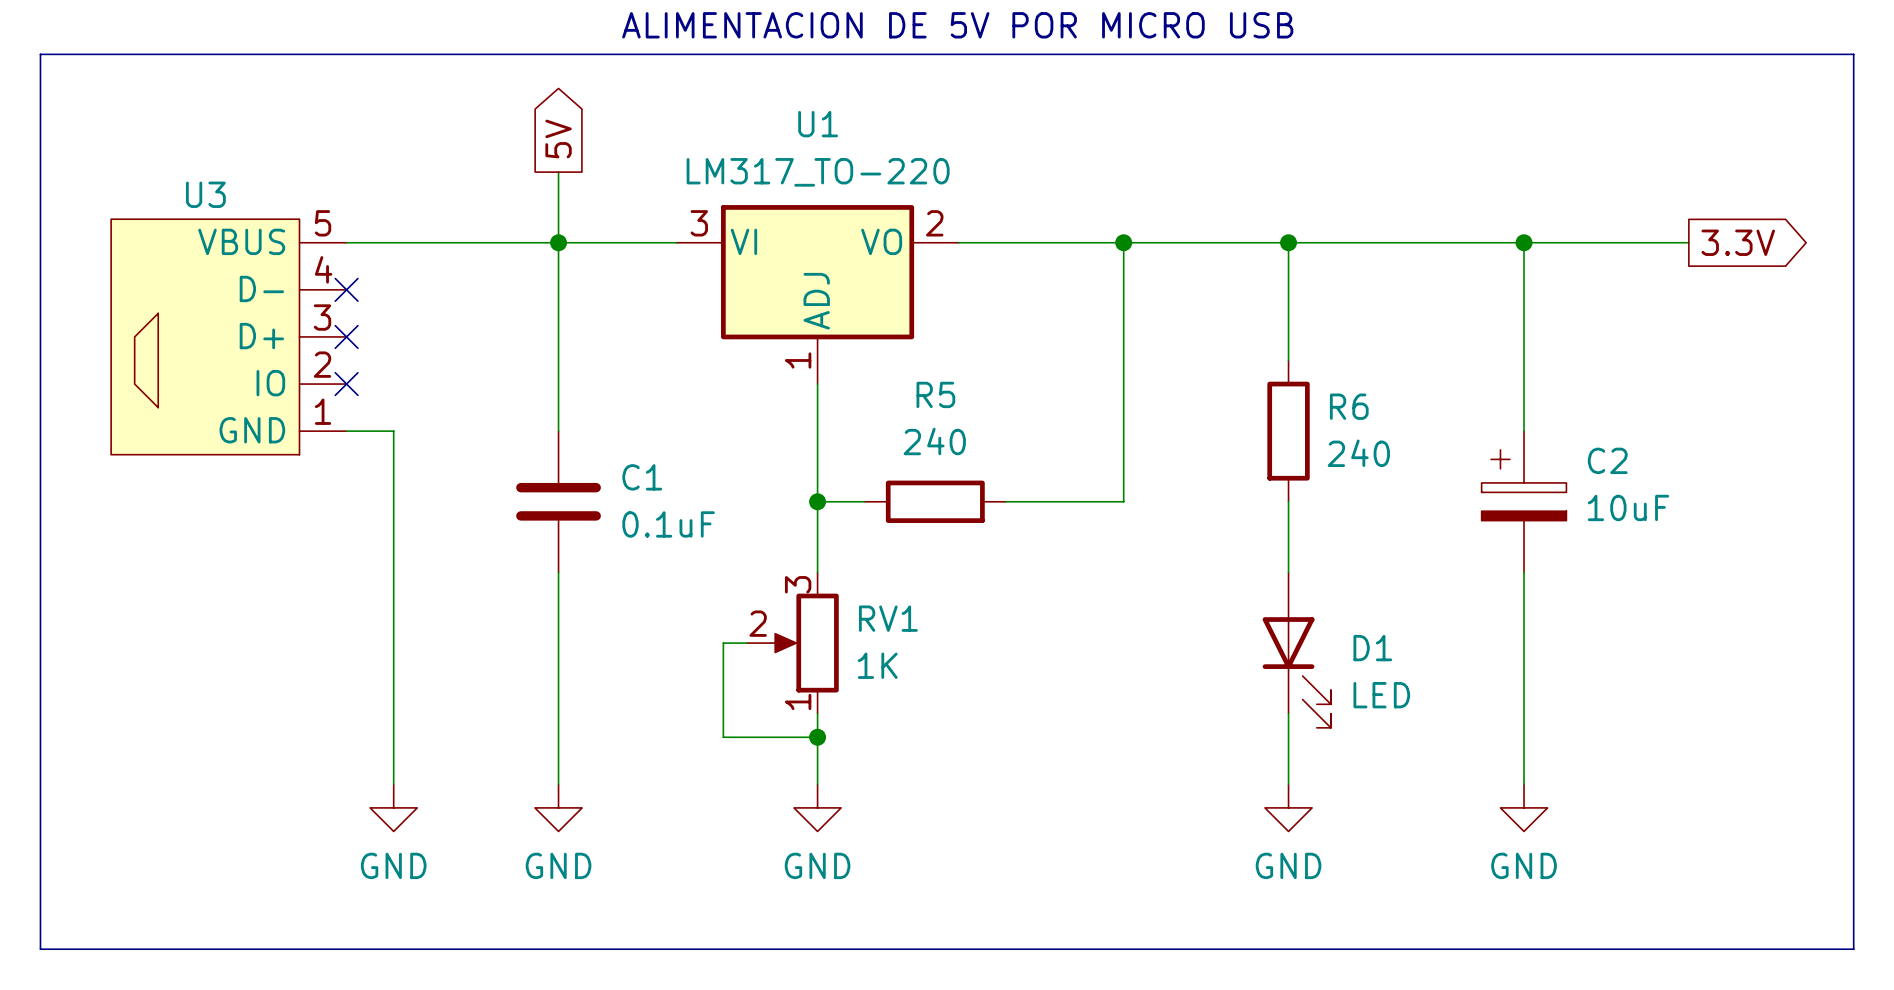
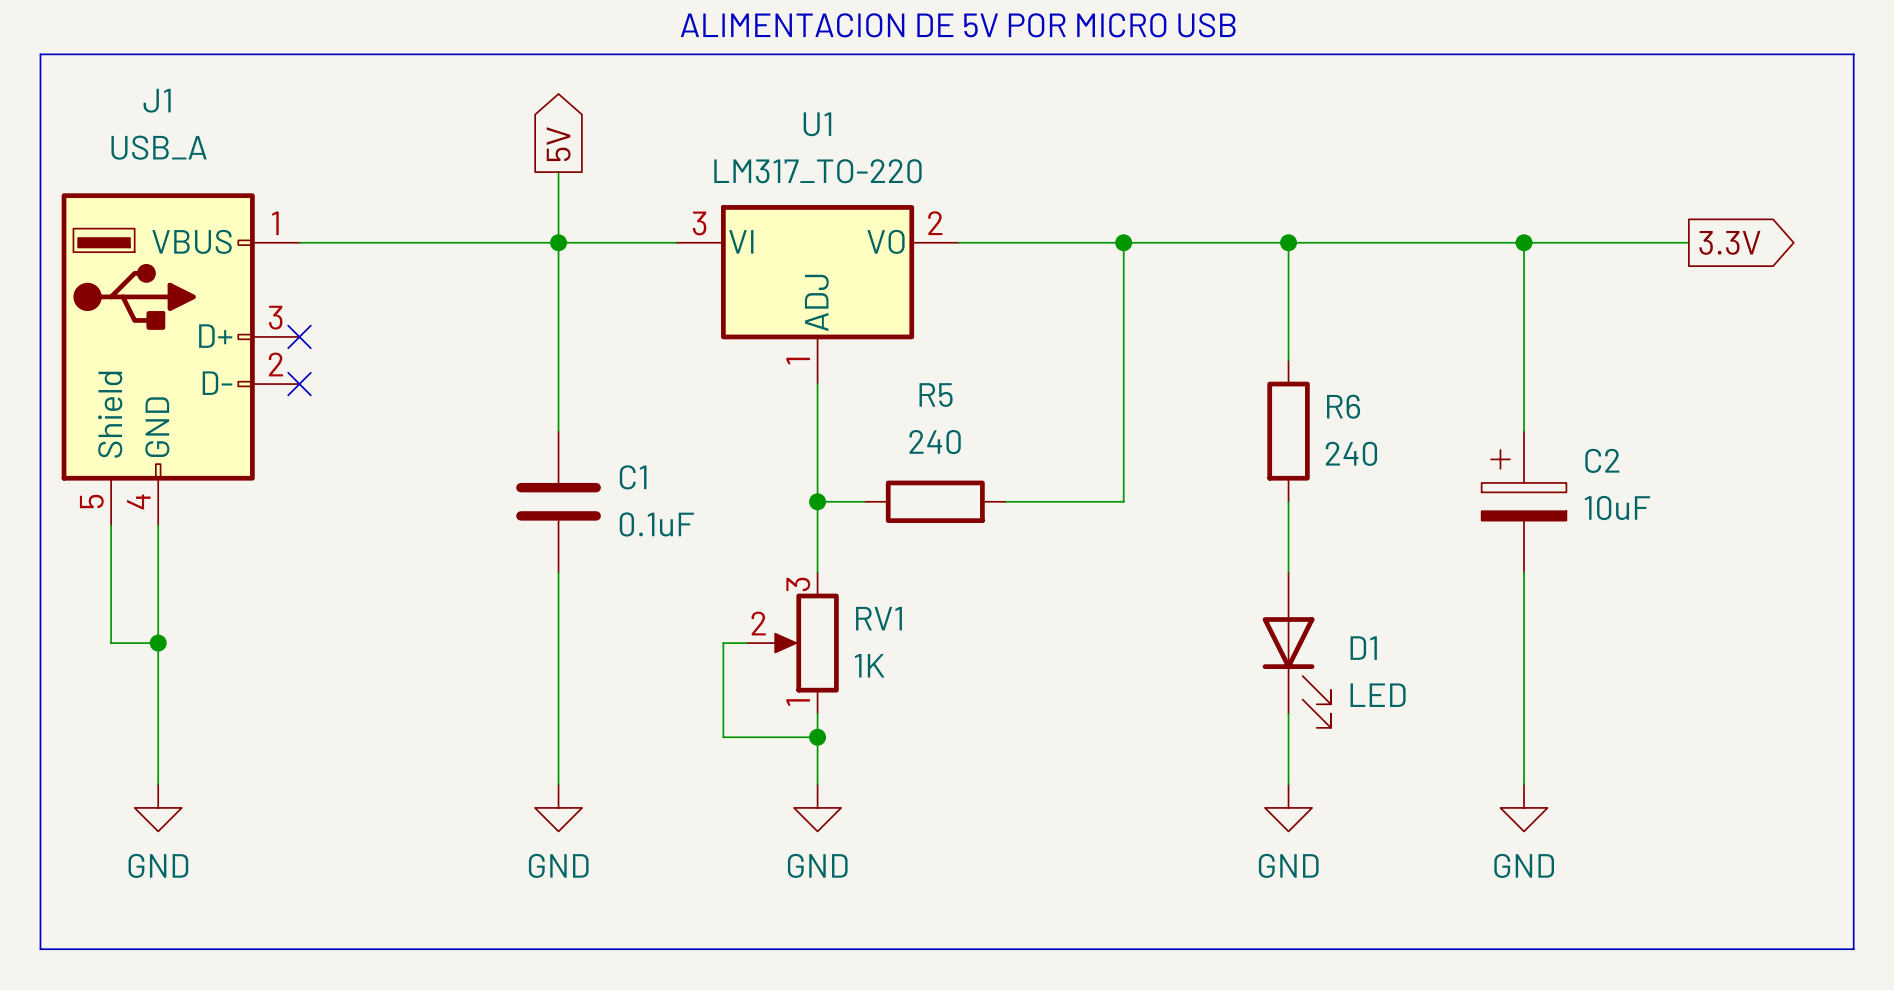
no-connect mark: (346, 289) -> none
U3: (228, 336) -> none
no-connect mark: none -> (299, 336)
no-connect mark: (346, 336) -> none
J1: none -> USB_A (180, 359)
no-connect mark: none -> (299, 384)
no-connect mark: (346, 384) -> none
wire: (346, 431) (393, 431) (393, 784) -> none
wire: none -> (111, 525) (111, 643) (158, 643)
wire: none -> (158, 525) (158, 784)
junction: none -> (158, 643)
power symbol position: GND (393, 807) -> GND (158, 807)

